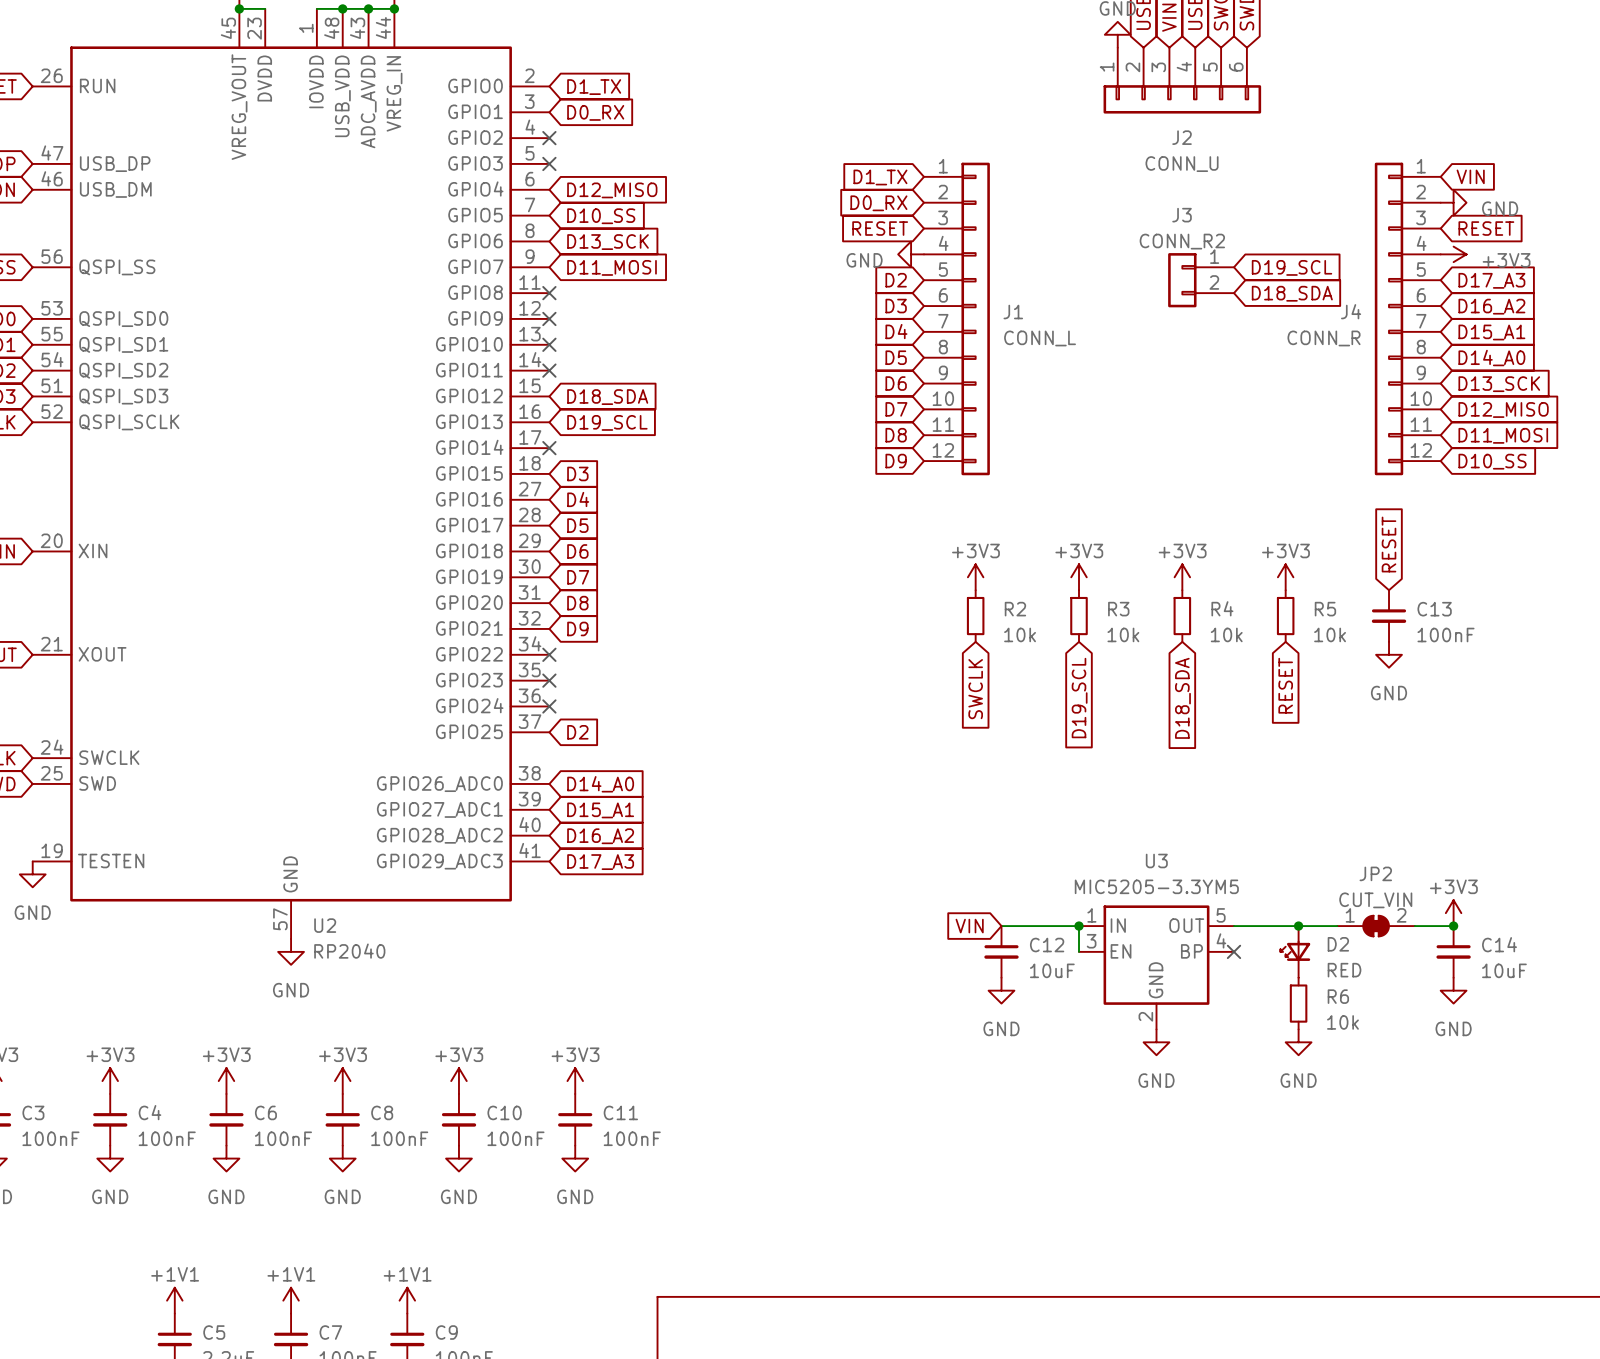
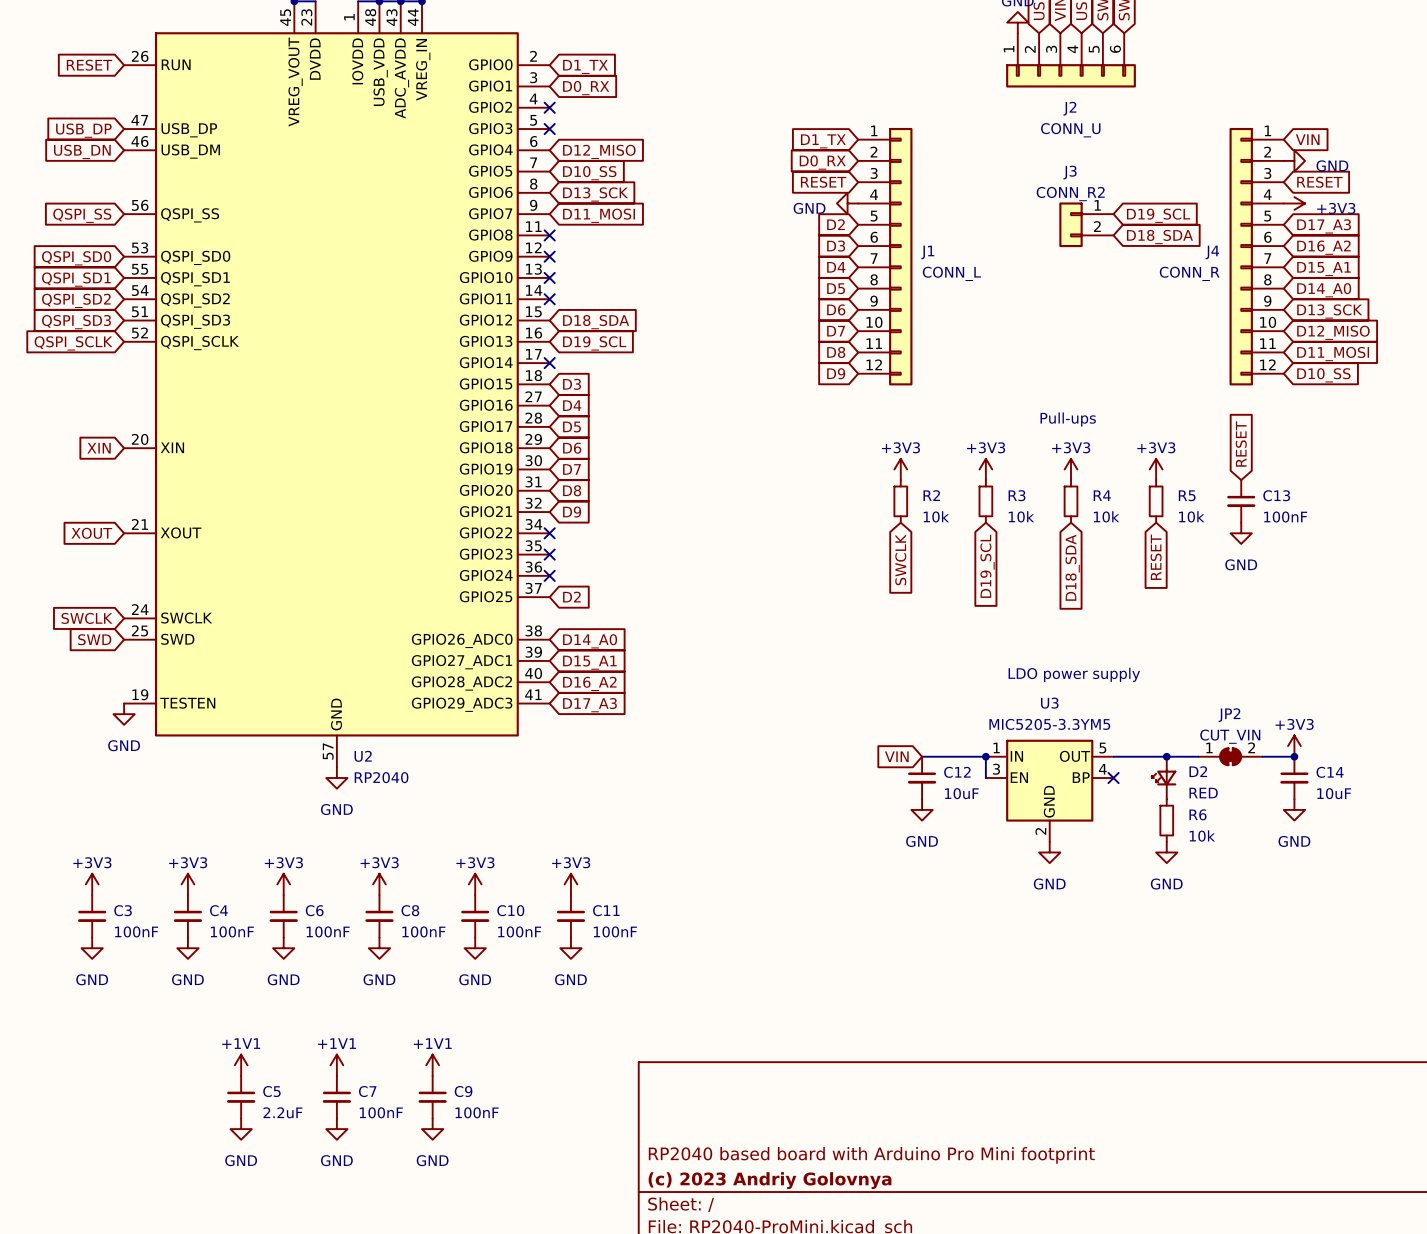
text: none -> Pull-ups (1068, 419)
text: none -> LDO power supply (1074, 674)

